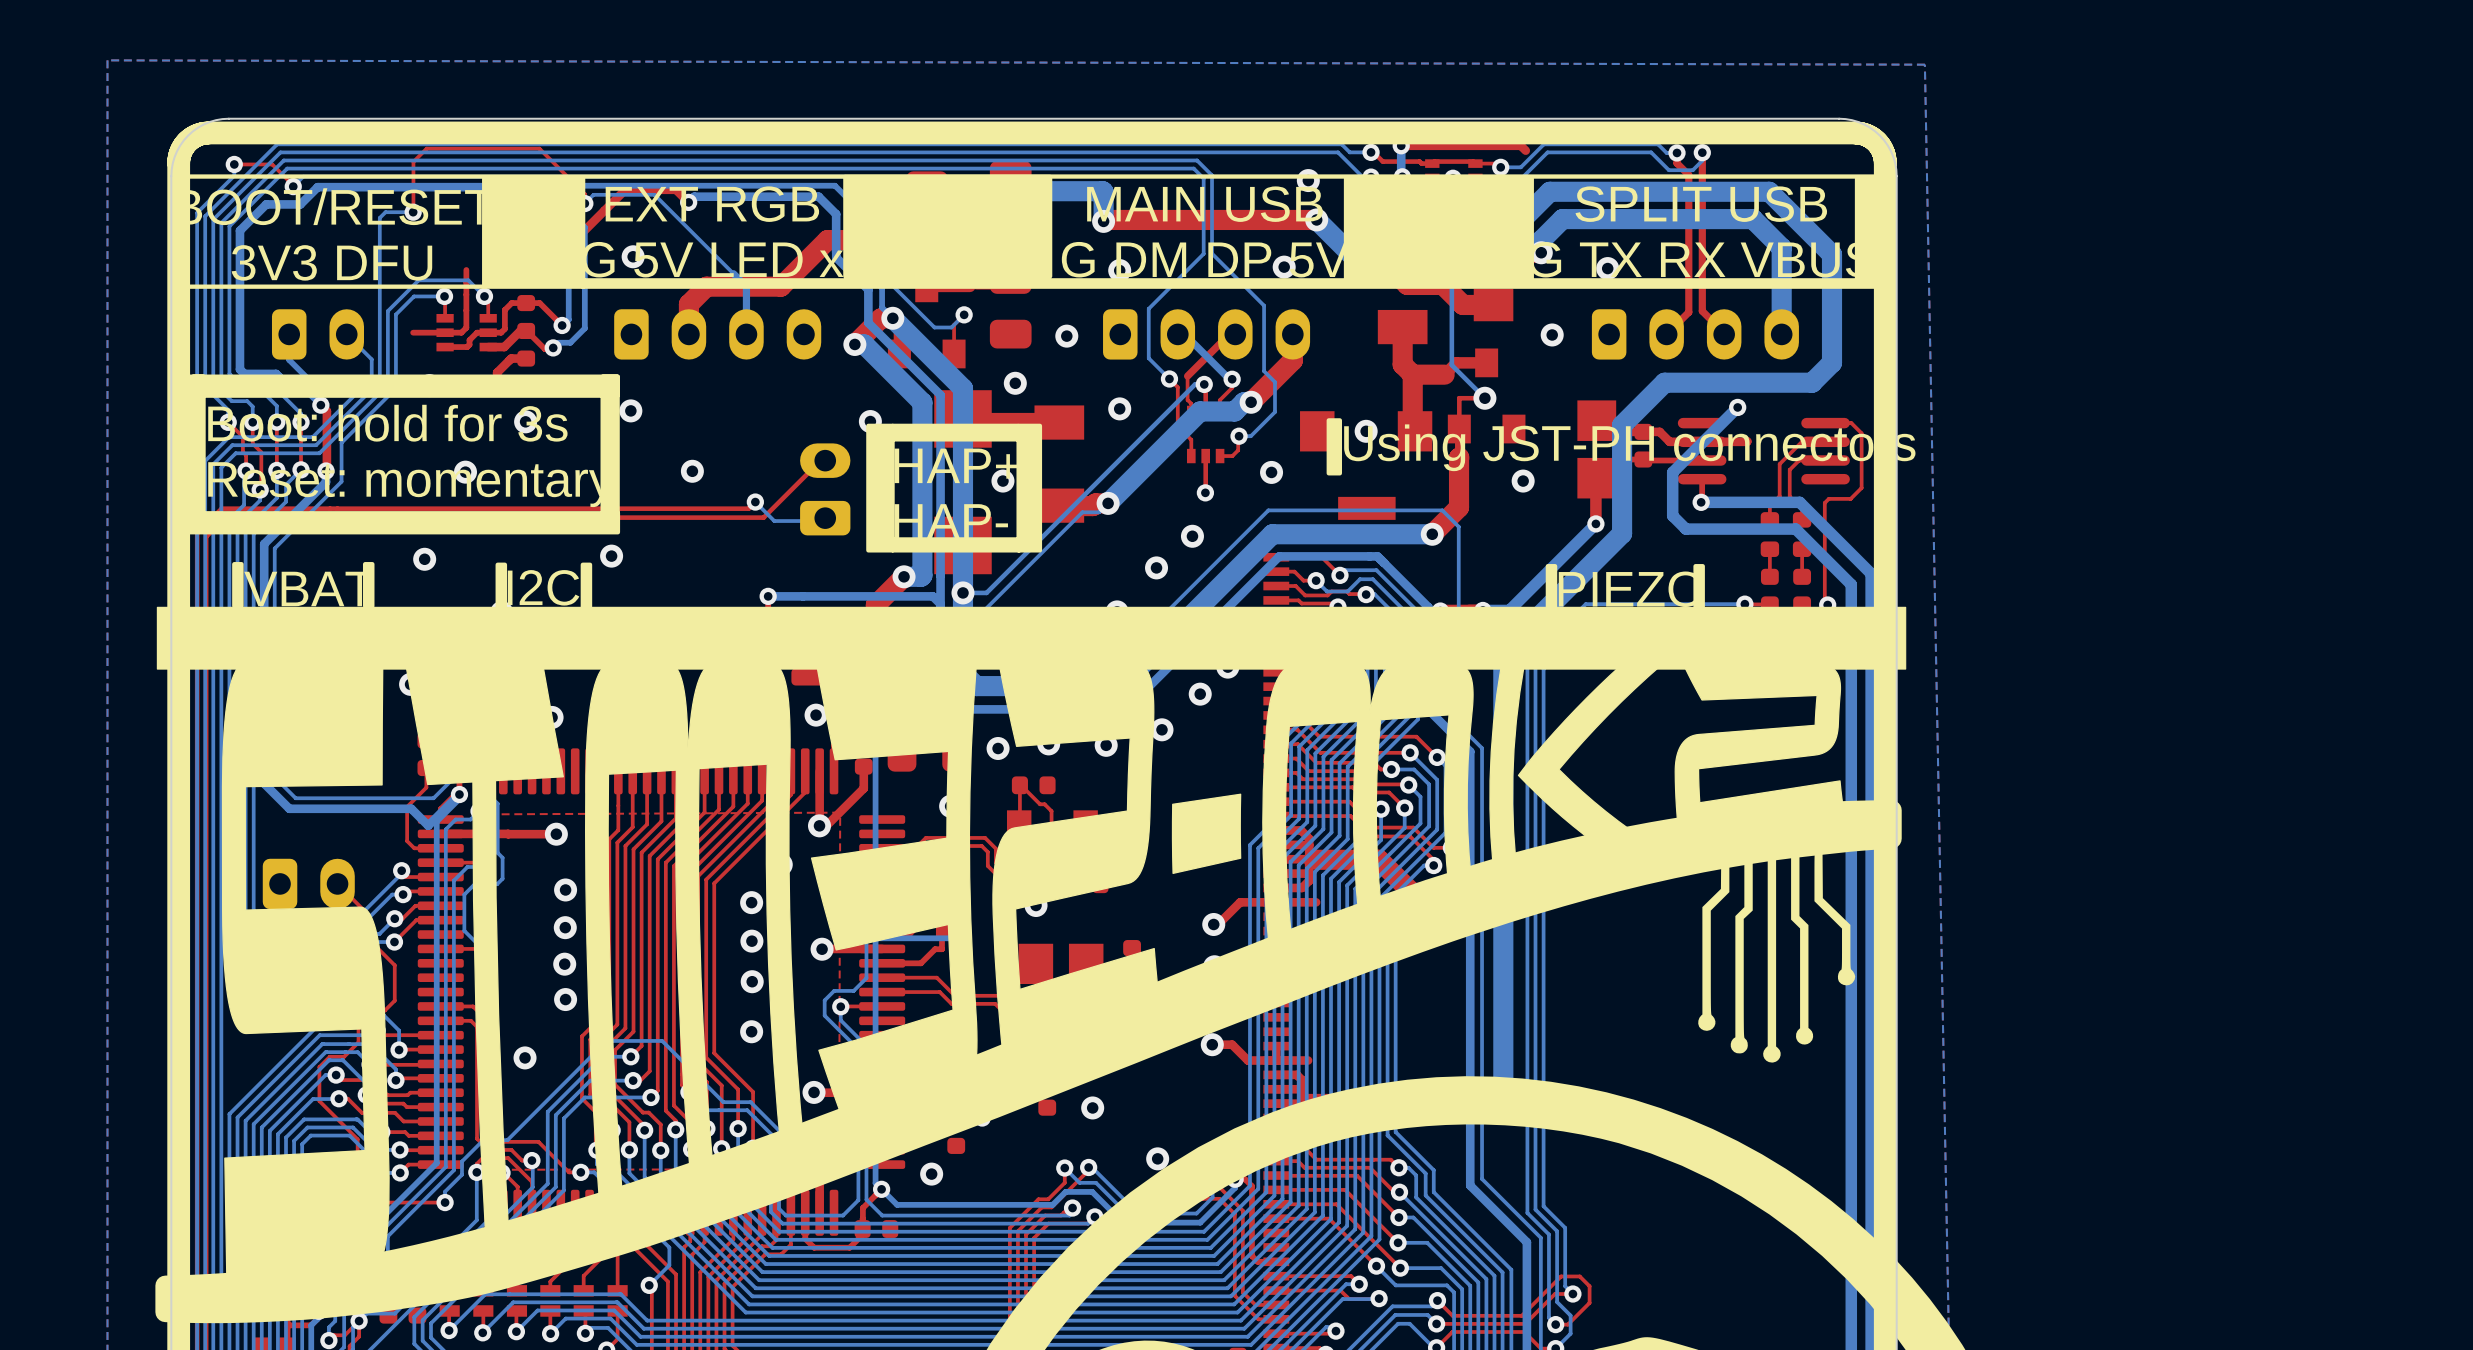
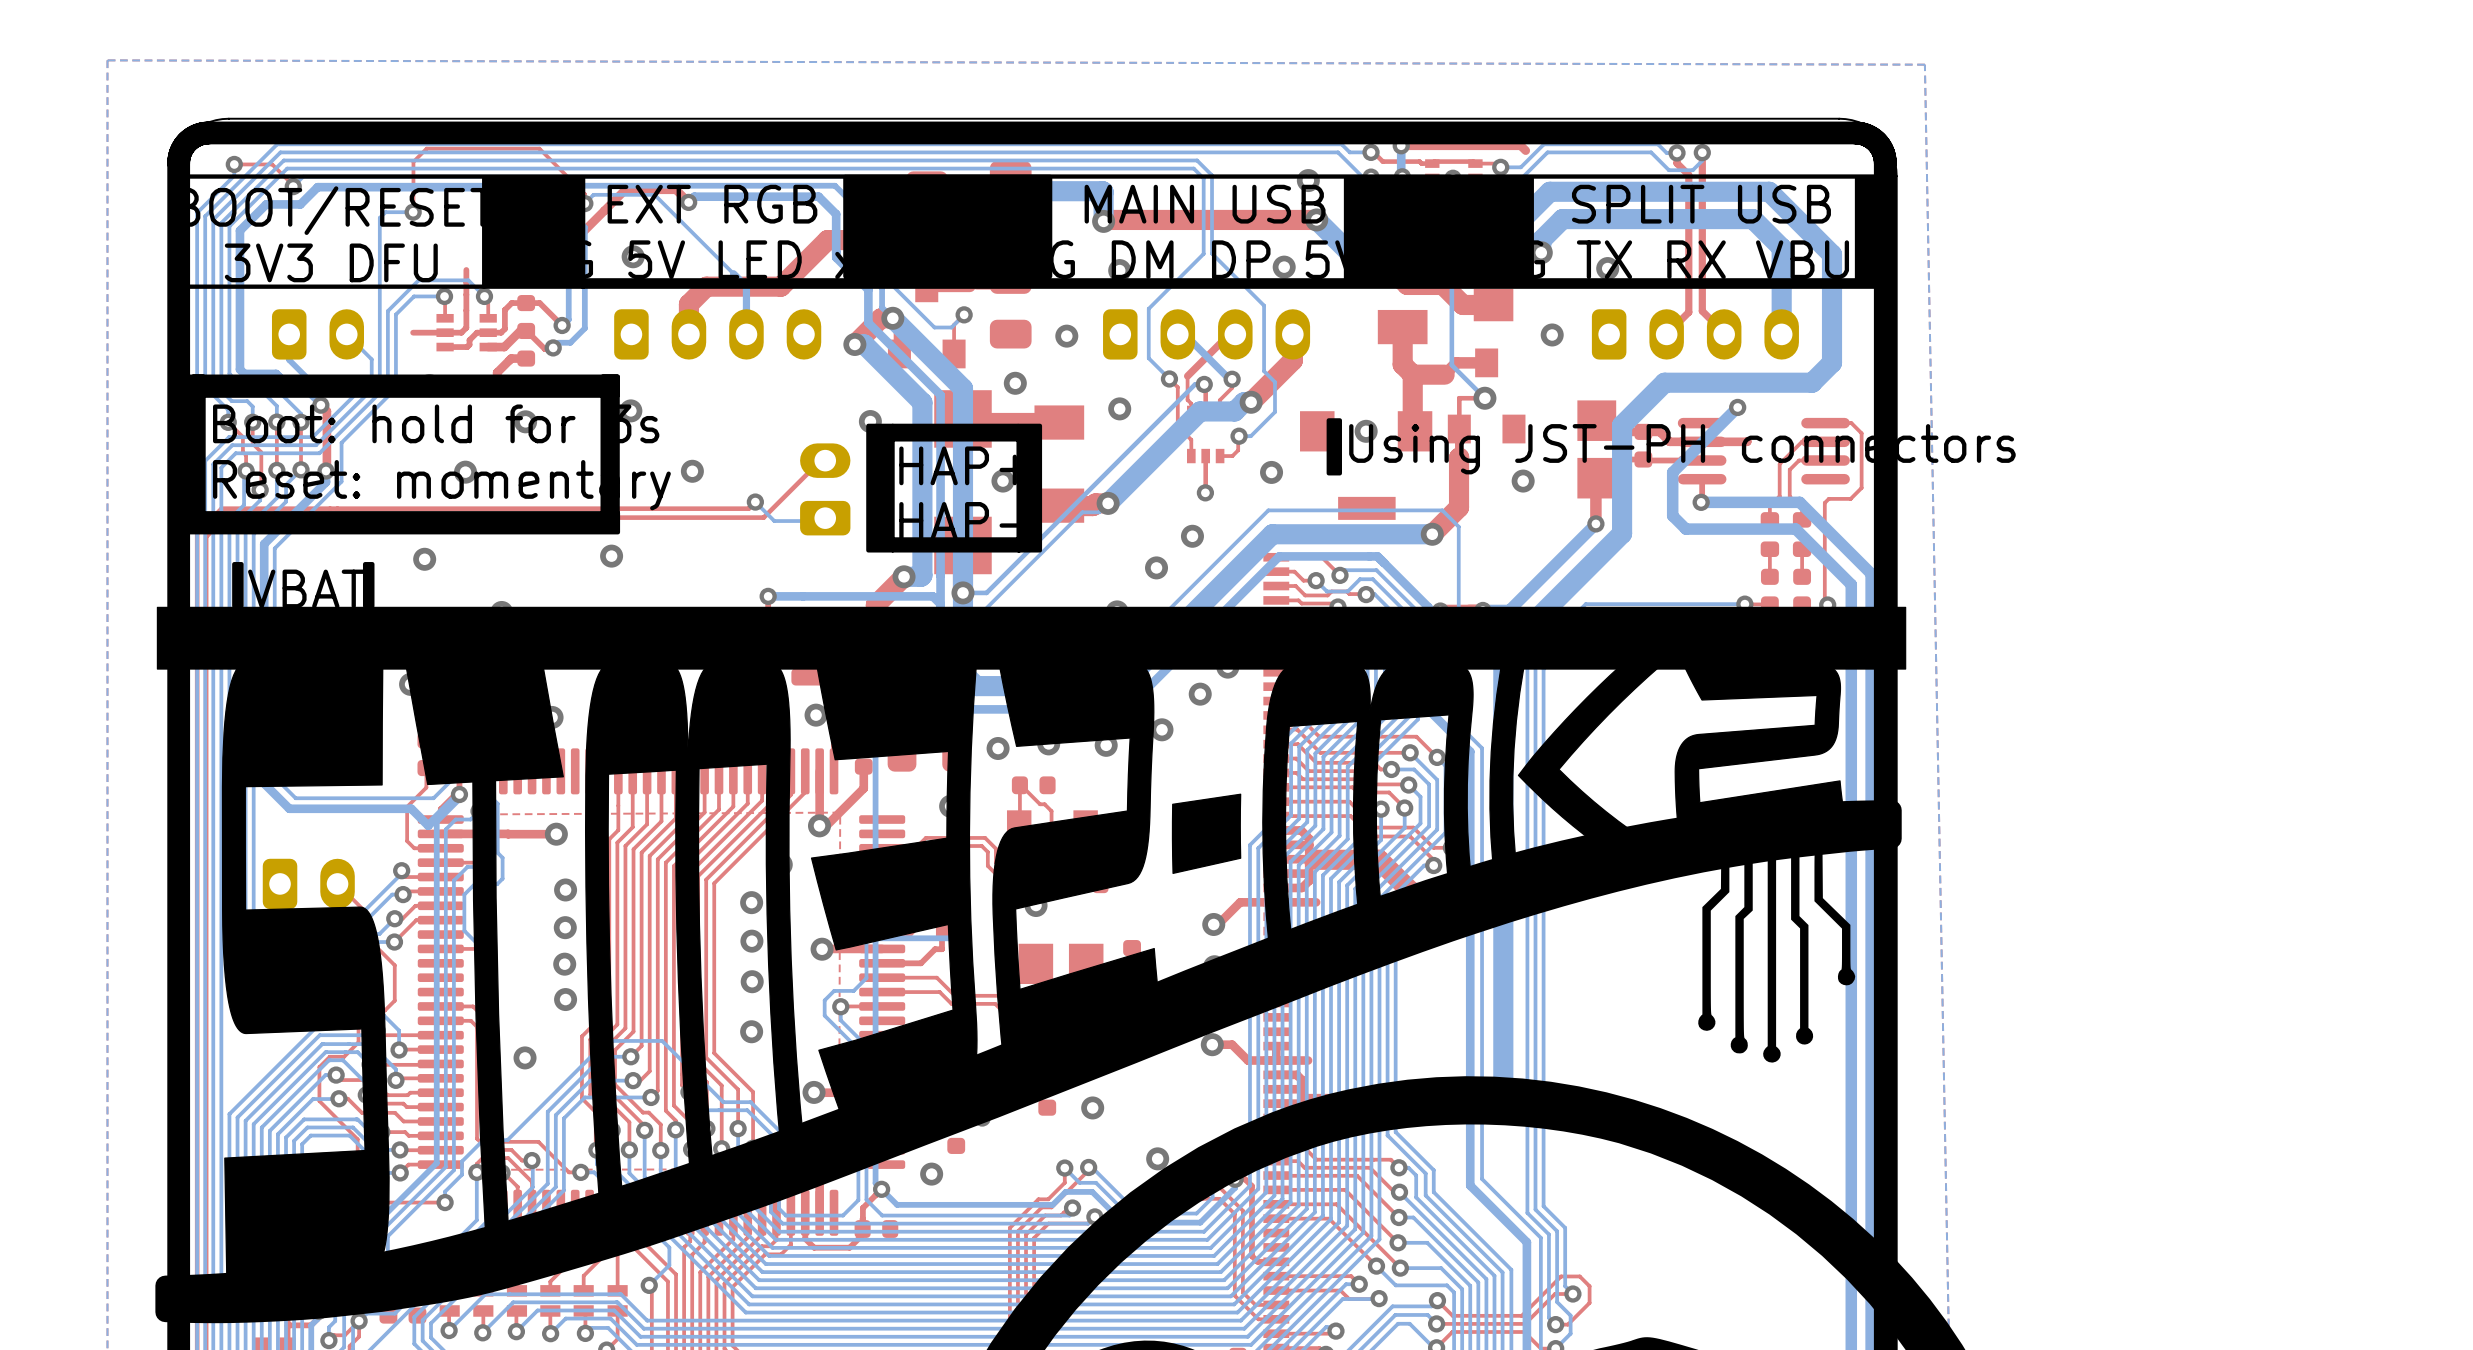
drawing: [495, 562, 508, 609] -> none
drawing: [580, 562, 593, 609] -> none
drawing: [1545, 564, 1558, 611] -> none
drawing: [1693, 564, 1705, 611] -> none
text: I2C (543, 587) -> none
text: PIEZO (1630, 589) -> none

